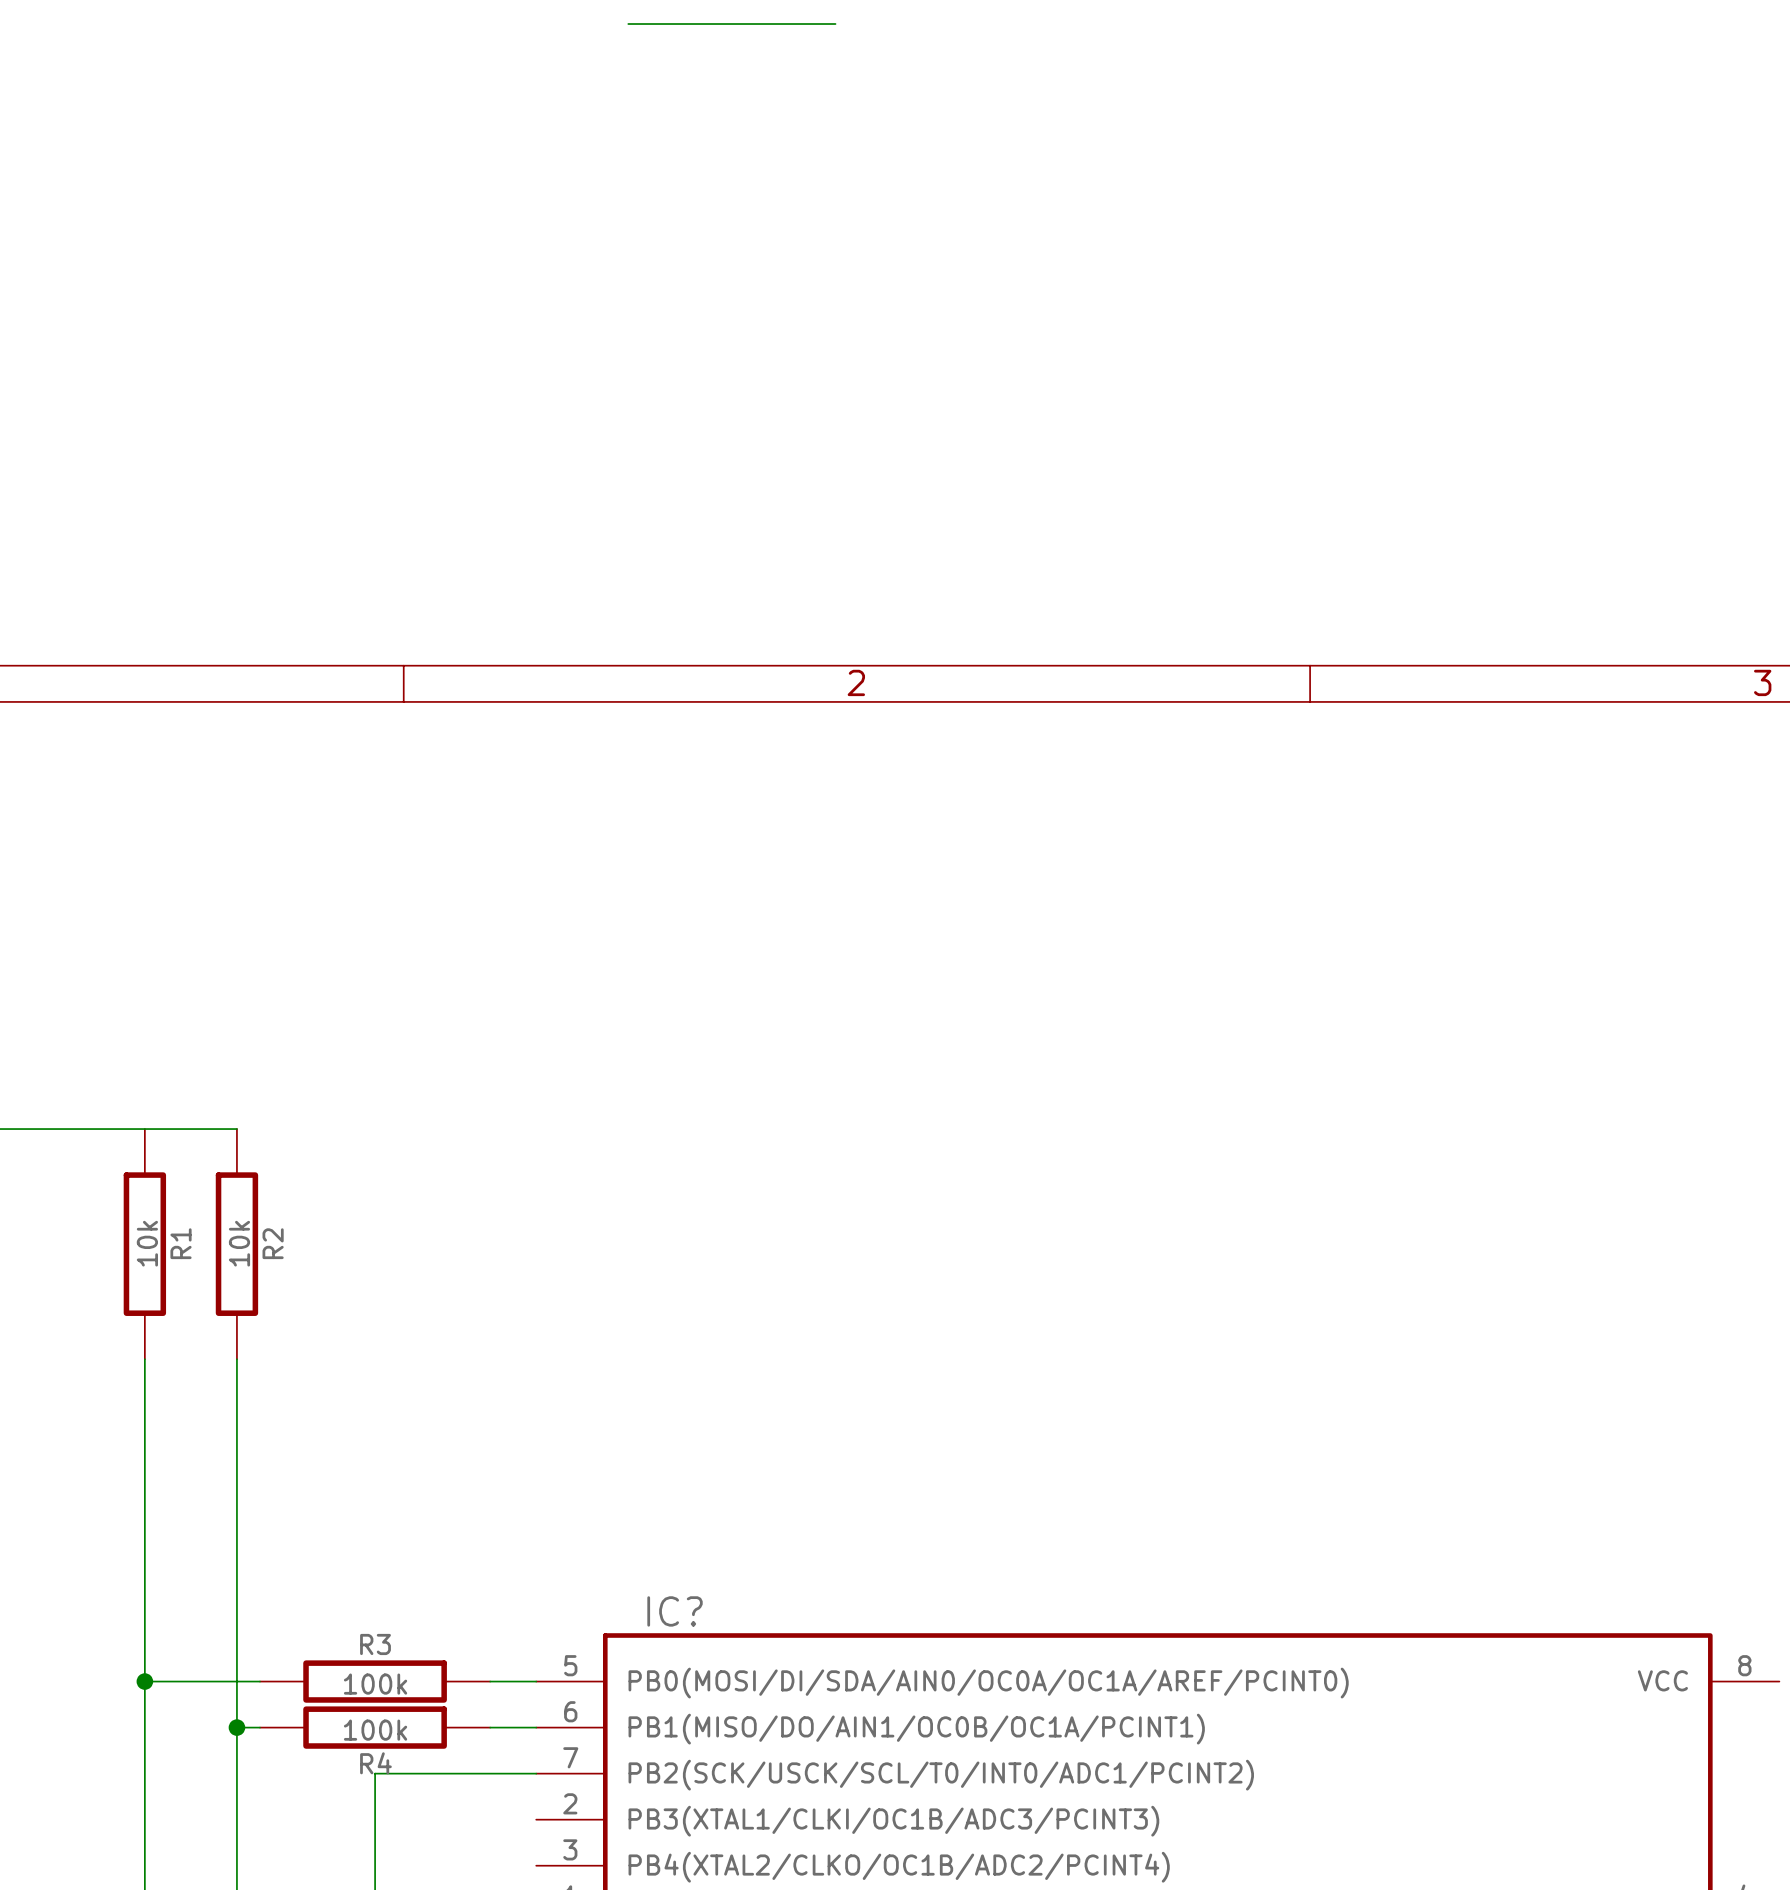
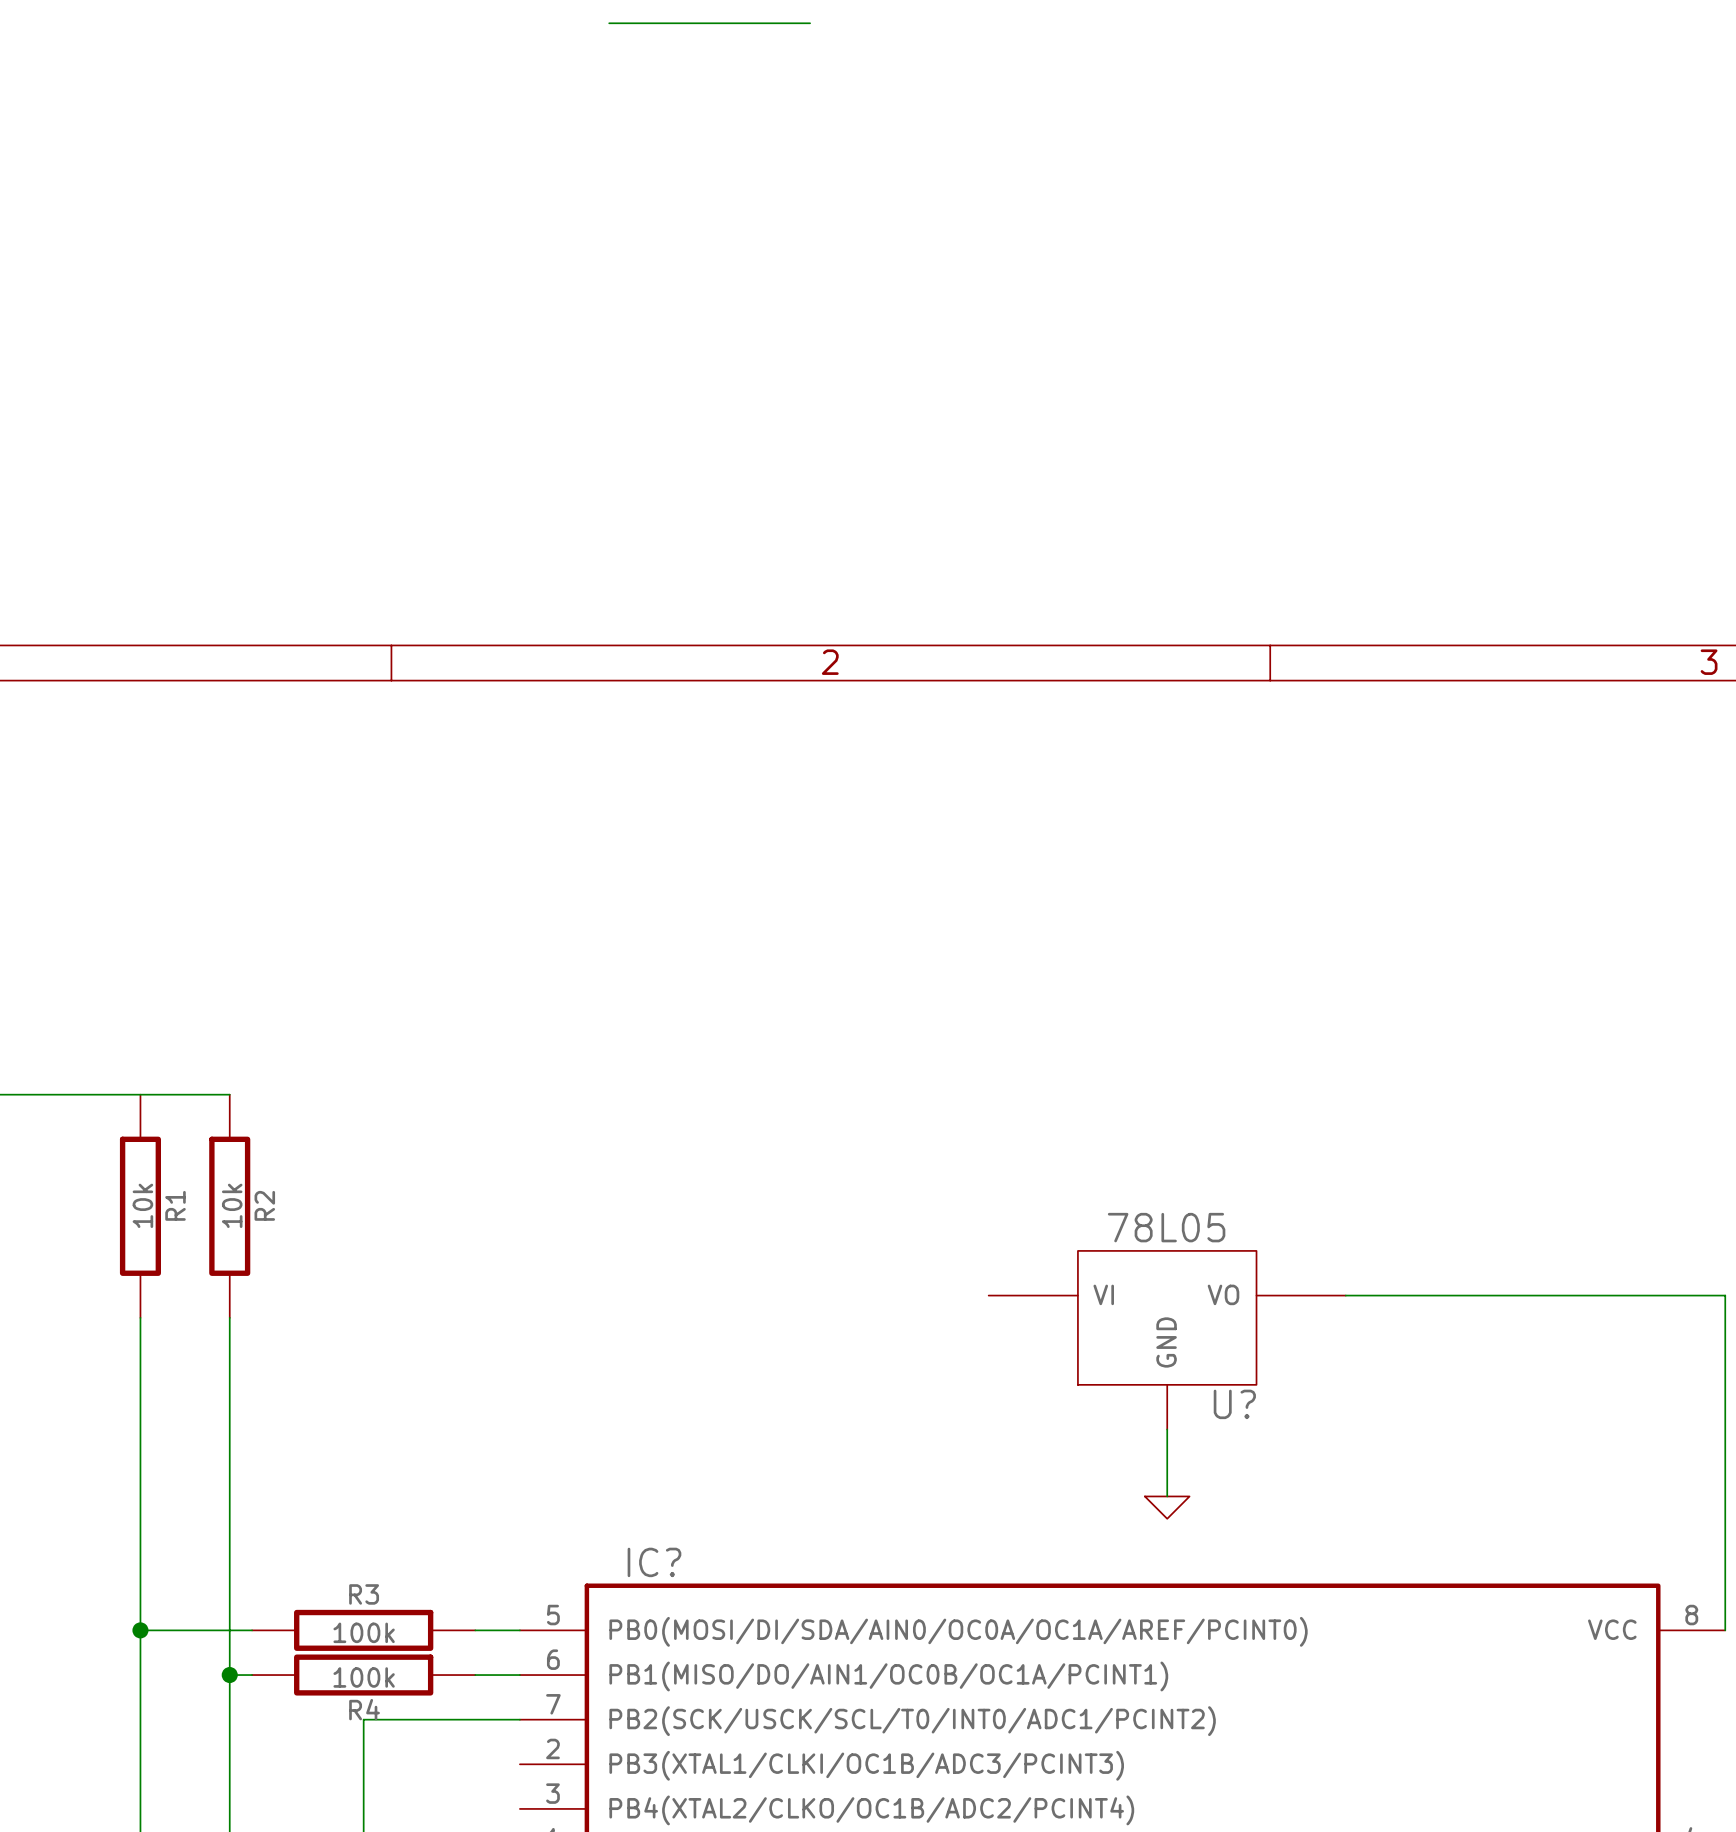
wire: none -> (1345, 1295) (1725, 1295) (1725, 1630)
U?: none -> 78L05 (1167, 1340)
wire: none -> (1167, 1429) (1167, 1496)
power symbol: none -> (1167, 1507)

